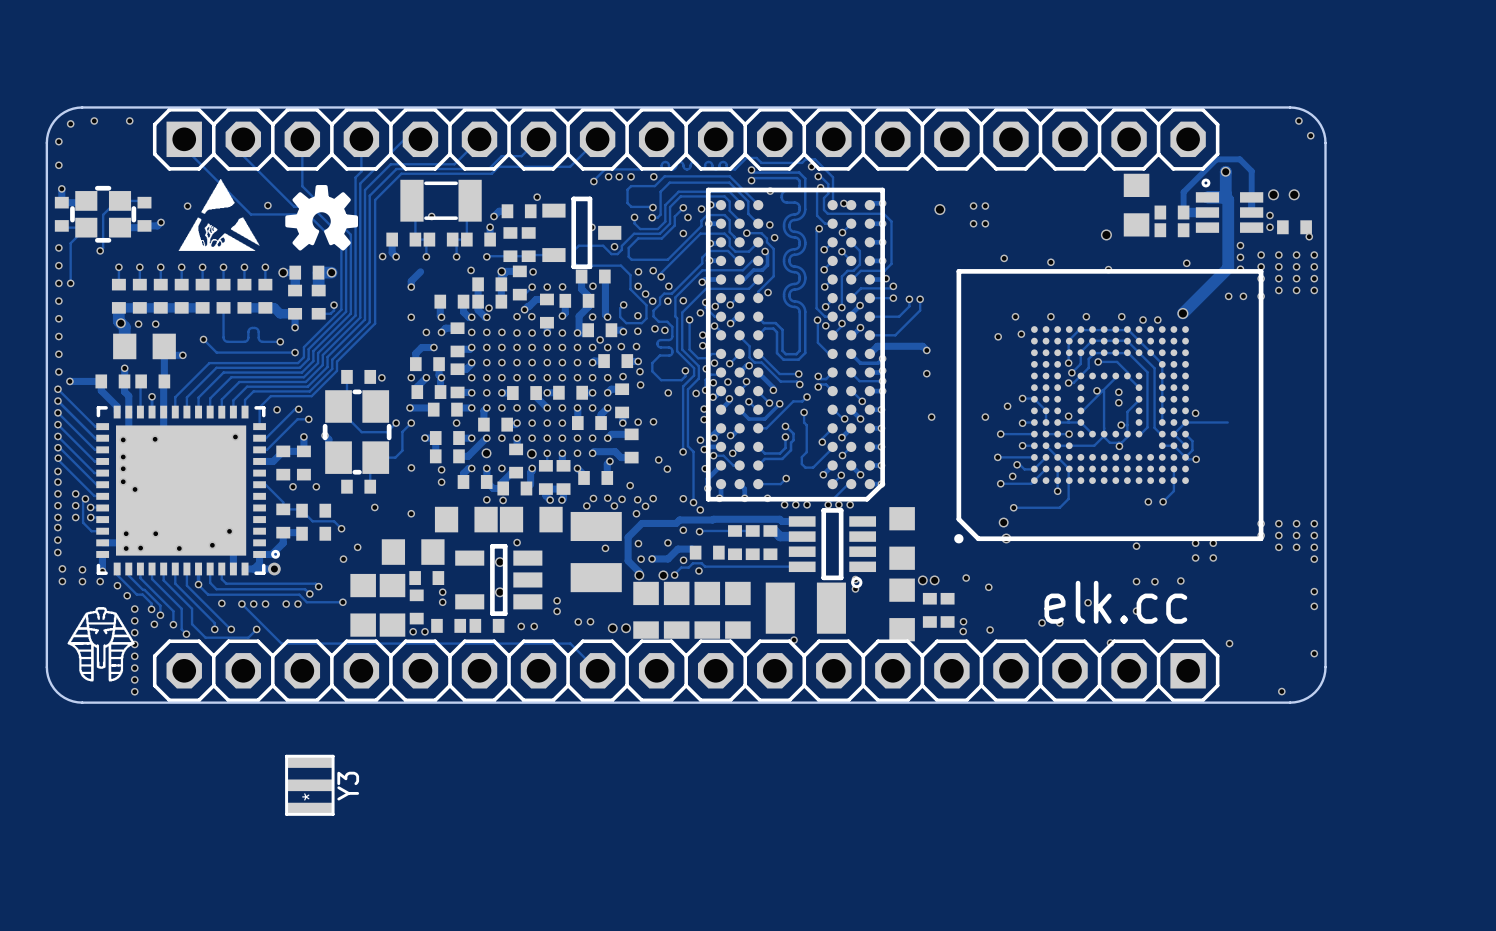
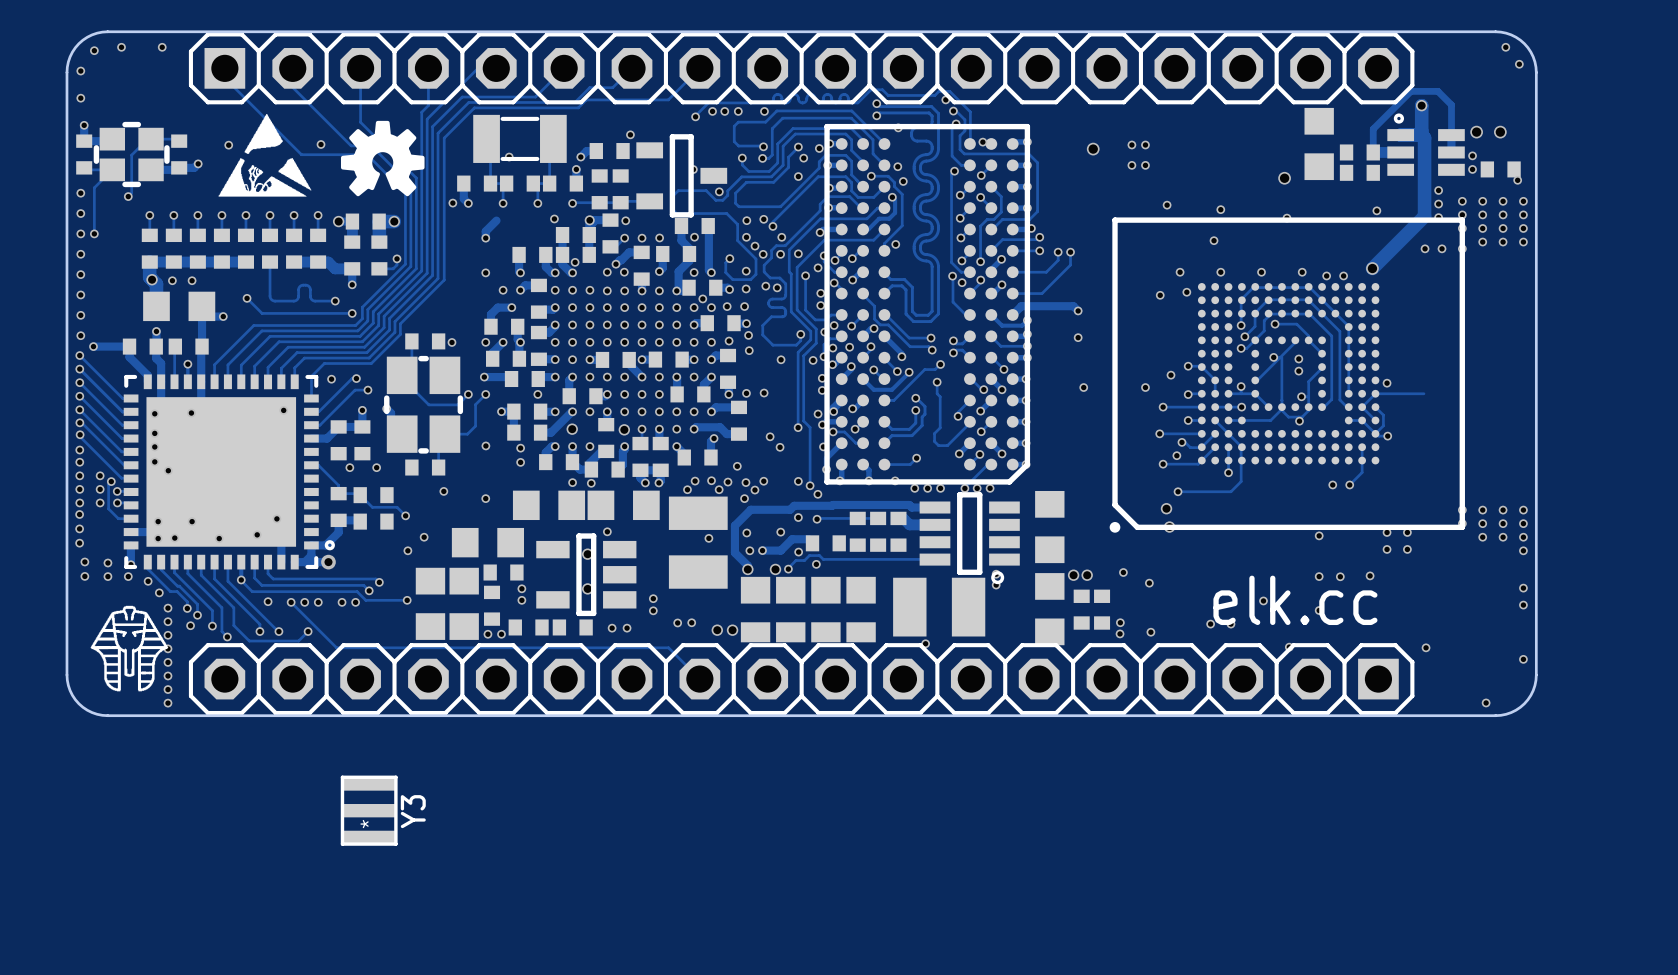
via: none -> (1214, 240)

